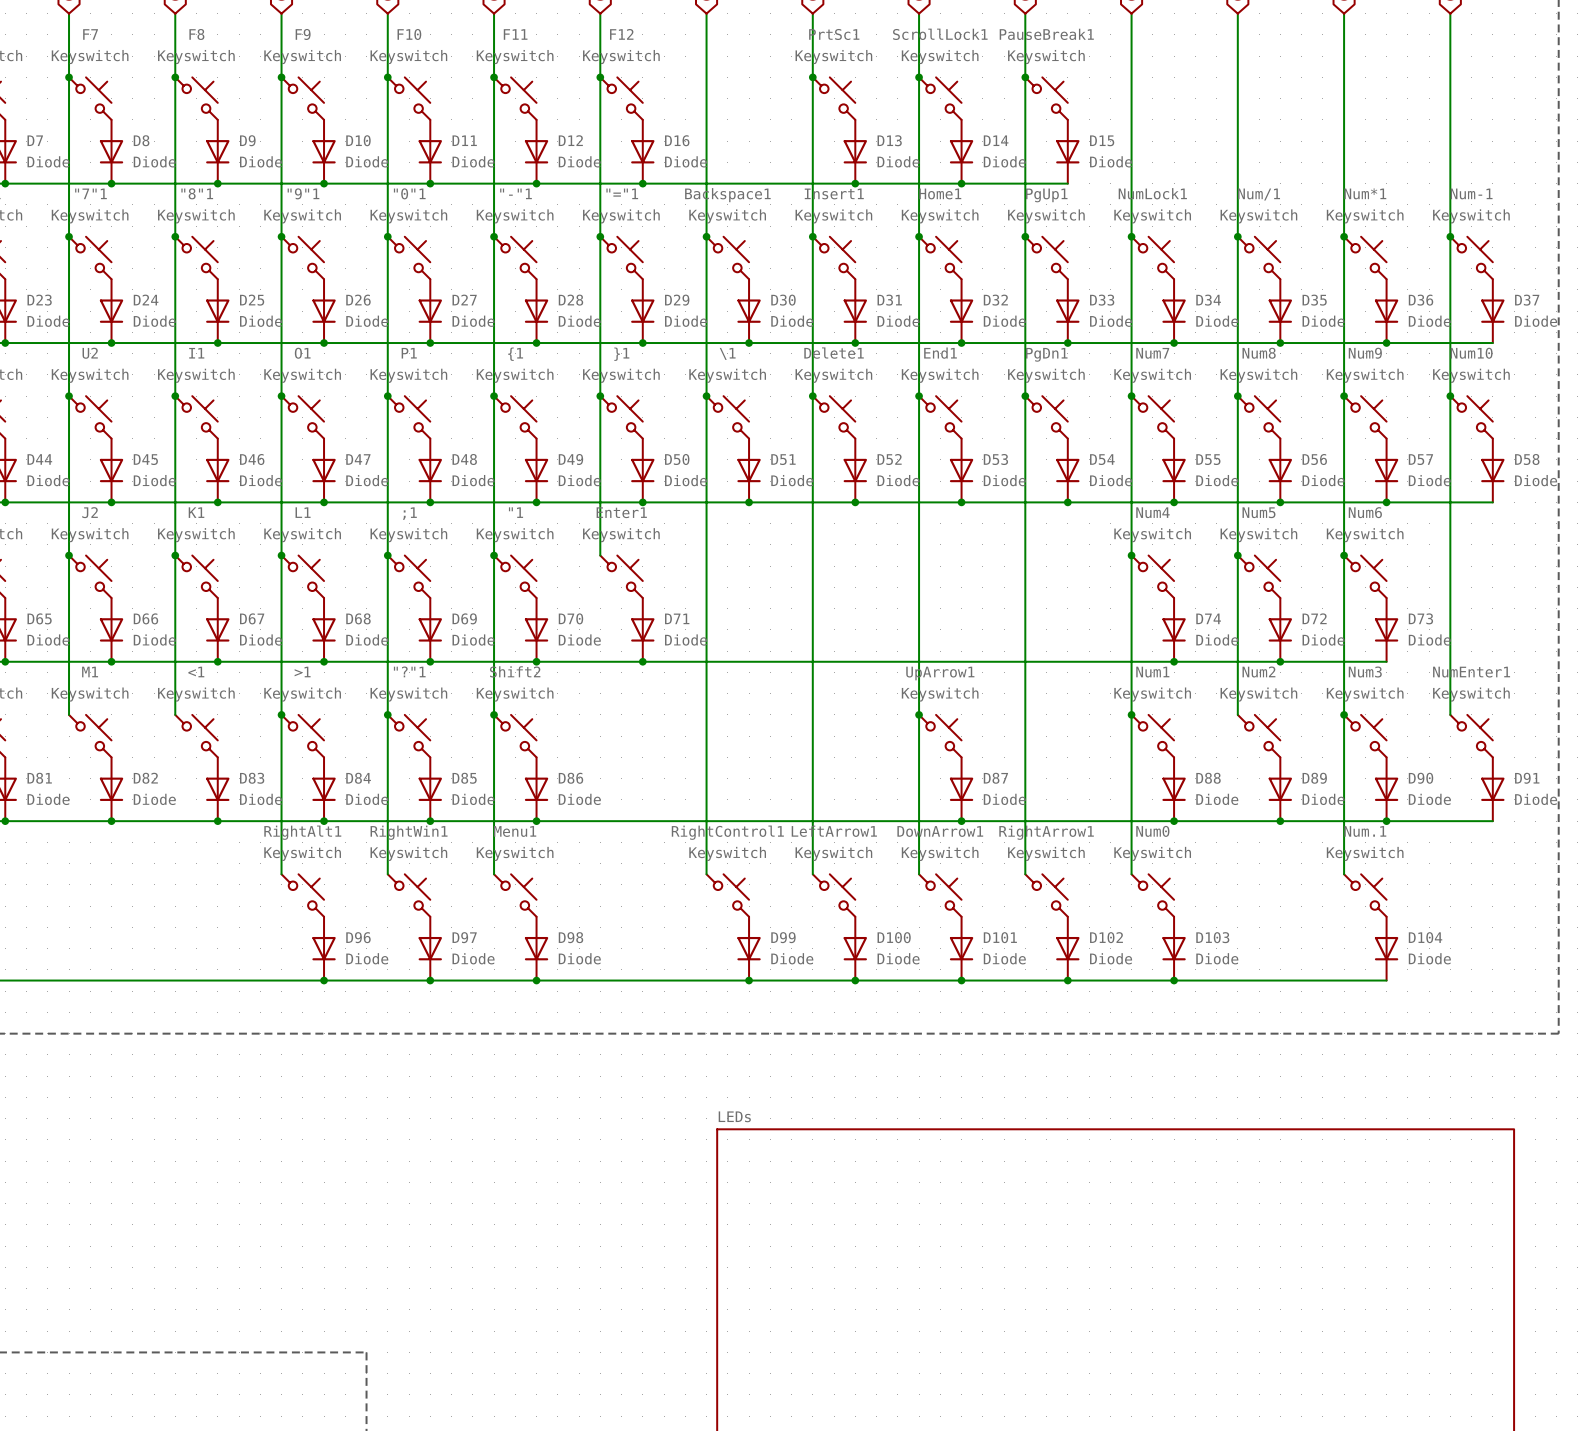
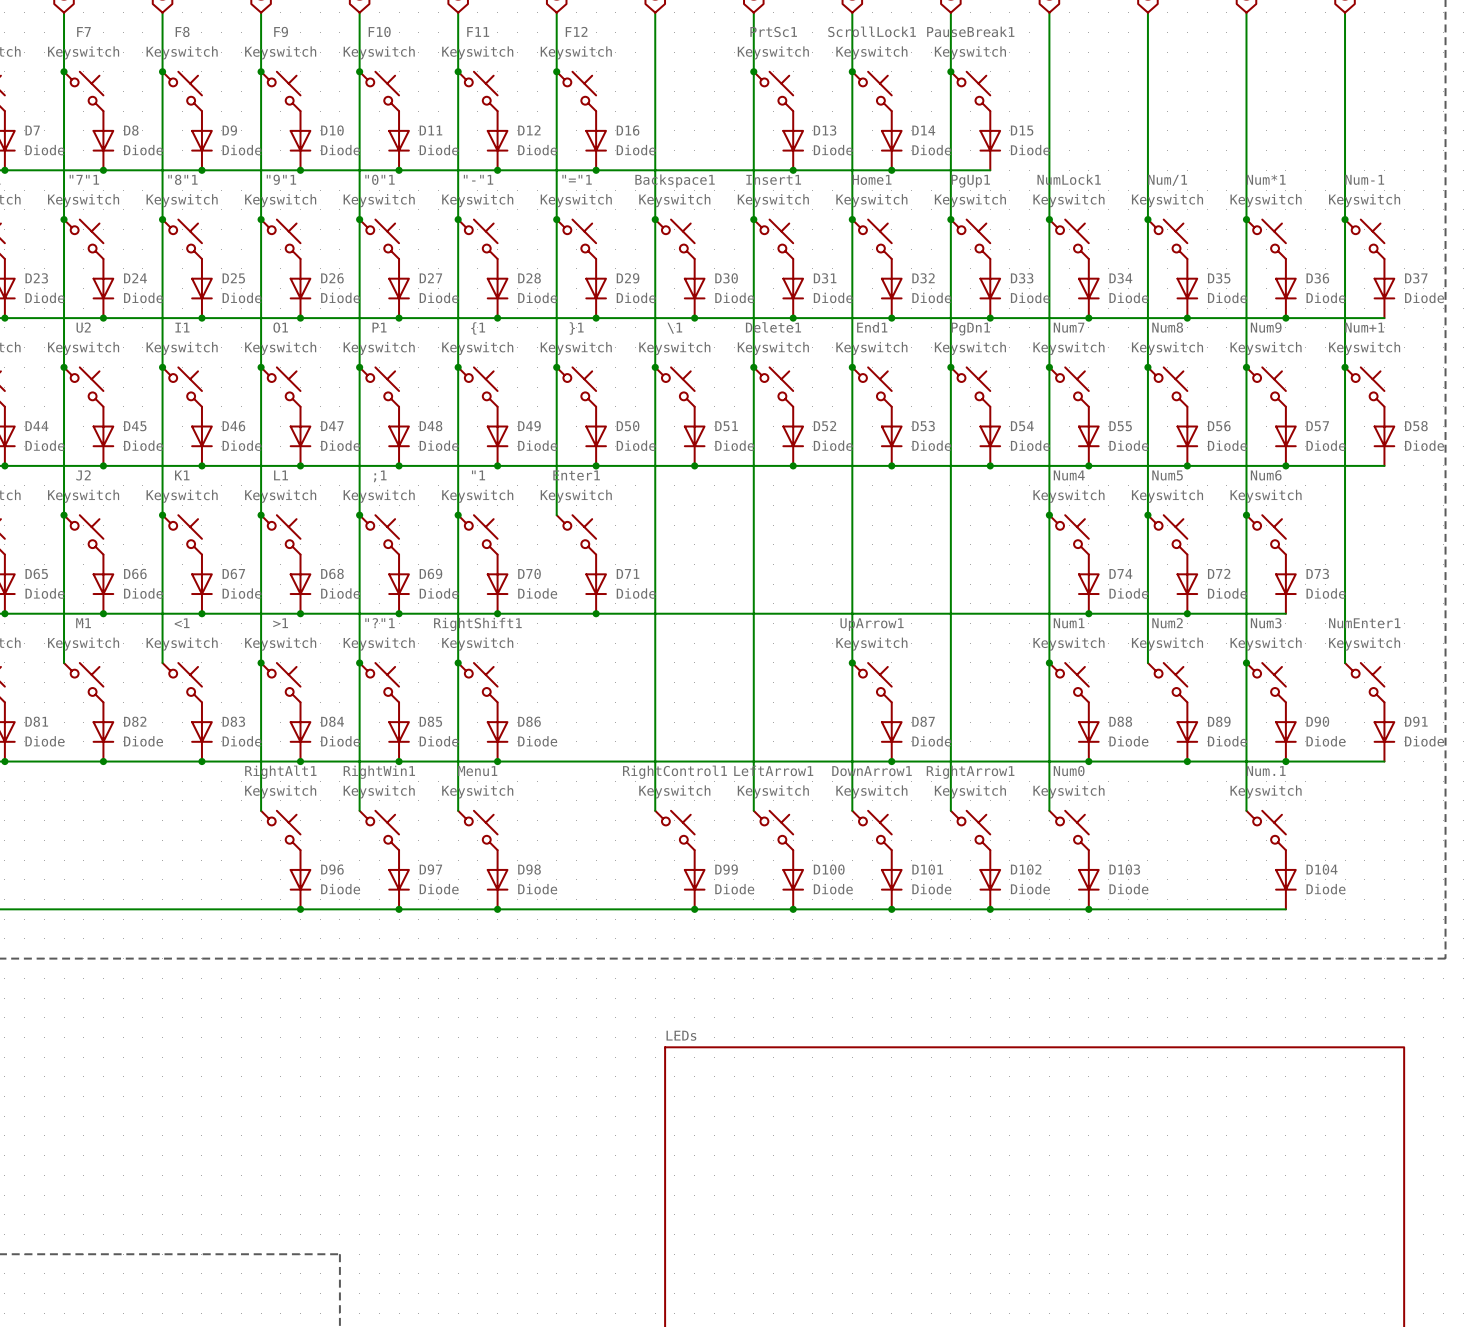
Num10 name: Num10 (1471, 353) -> Num+1 (1364, 327)
Shift2 name: Shift2 (515, 671) -> RightShift1 (477, 624)

